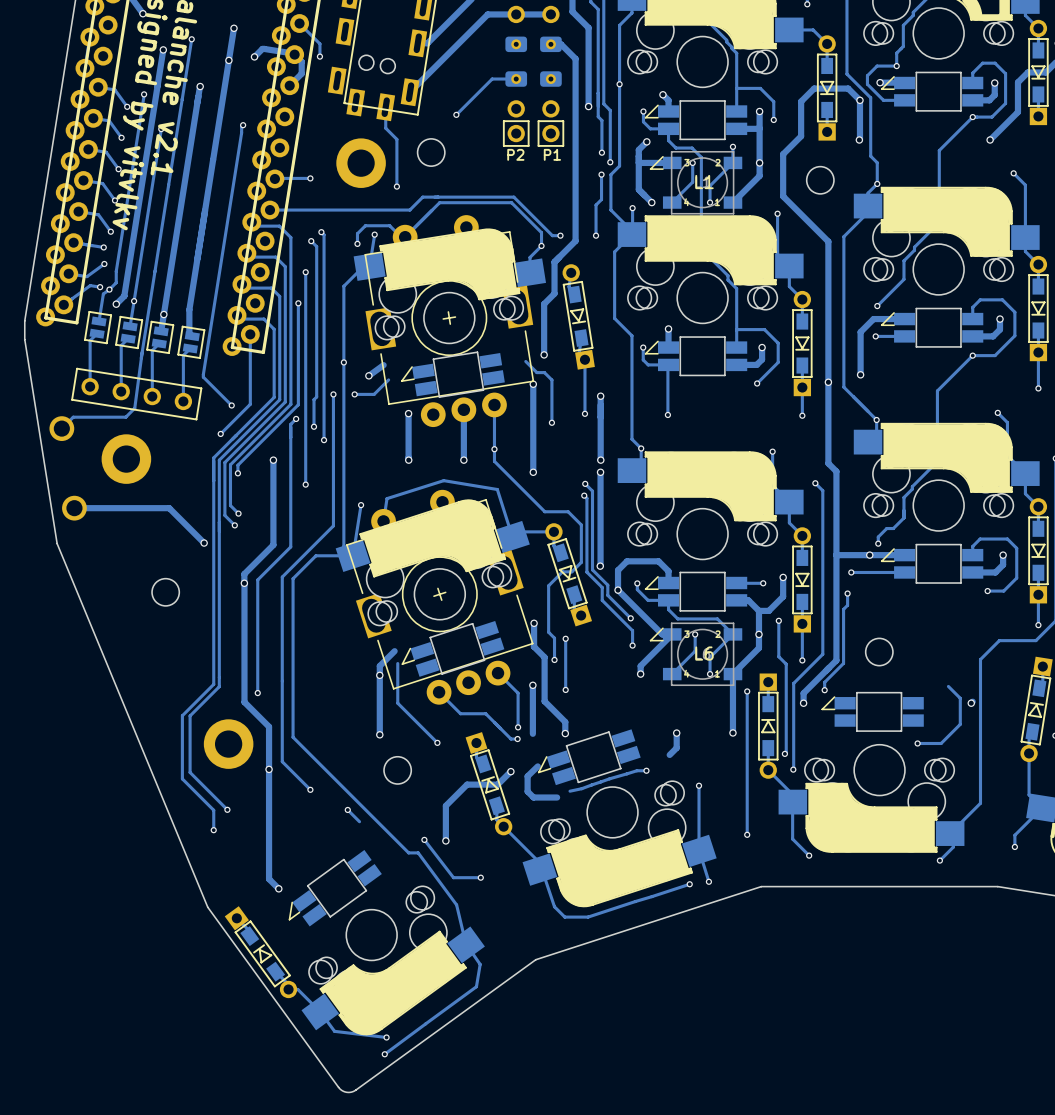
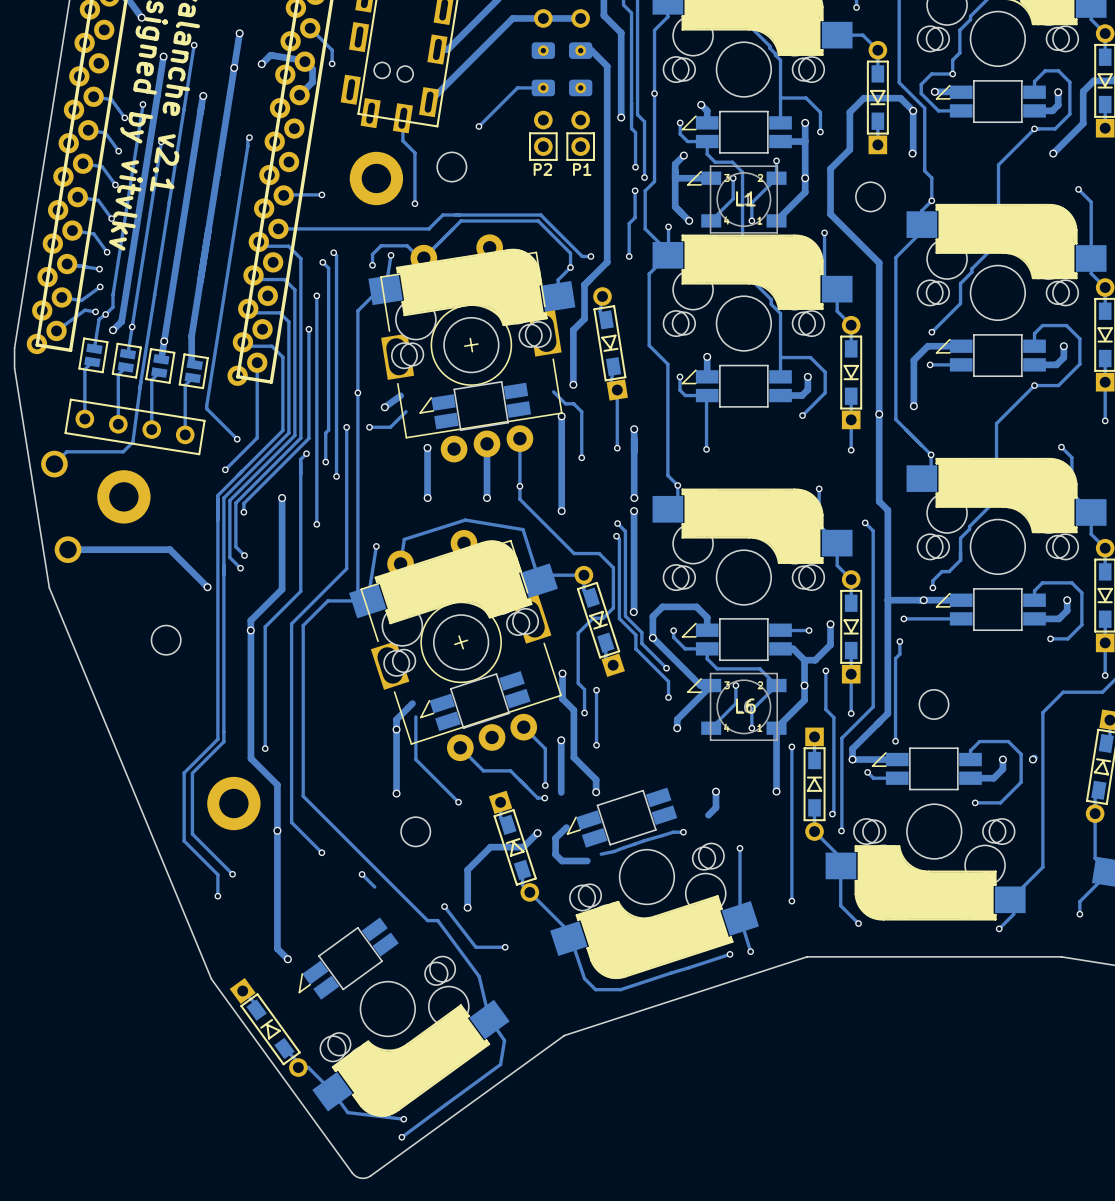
track: (843, 663) (824, 682) (824, 690) -> (895, 716) (895, 741)
via: none -> (895, 741)
track: none -> (1008, 741) (979, 741) (970, 750) (970, 759)
via: (824, 690) -> none
track: none -> (897, 759) (852, 759)
track: none -> (1002, 759) (1002, 769) (993, 778) (970, 778)
via: none -> (1002, 759)
track: none -> (867, 772) (873, 778) (897, 778)
via: none -> (867, 772)

